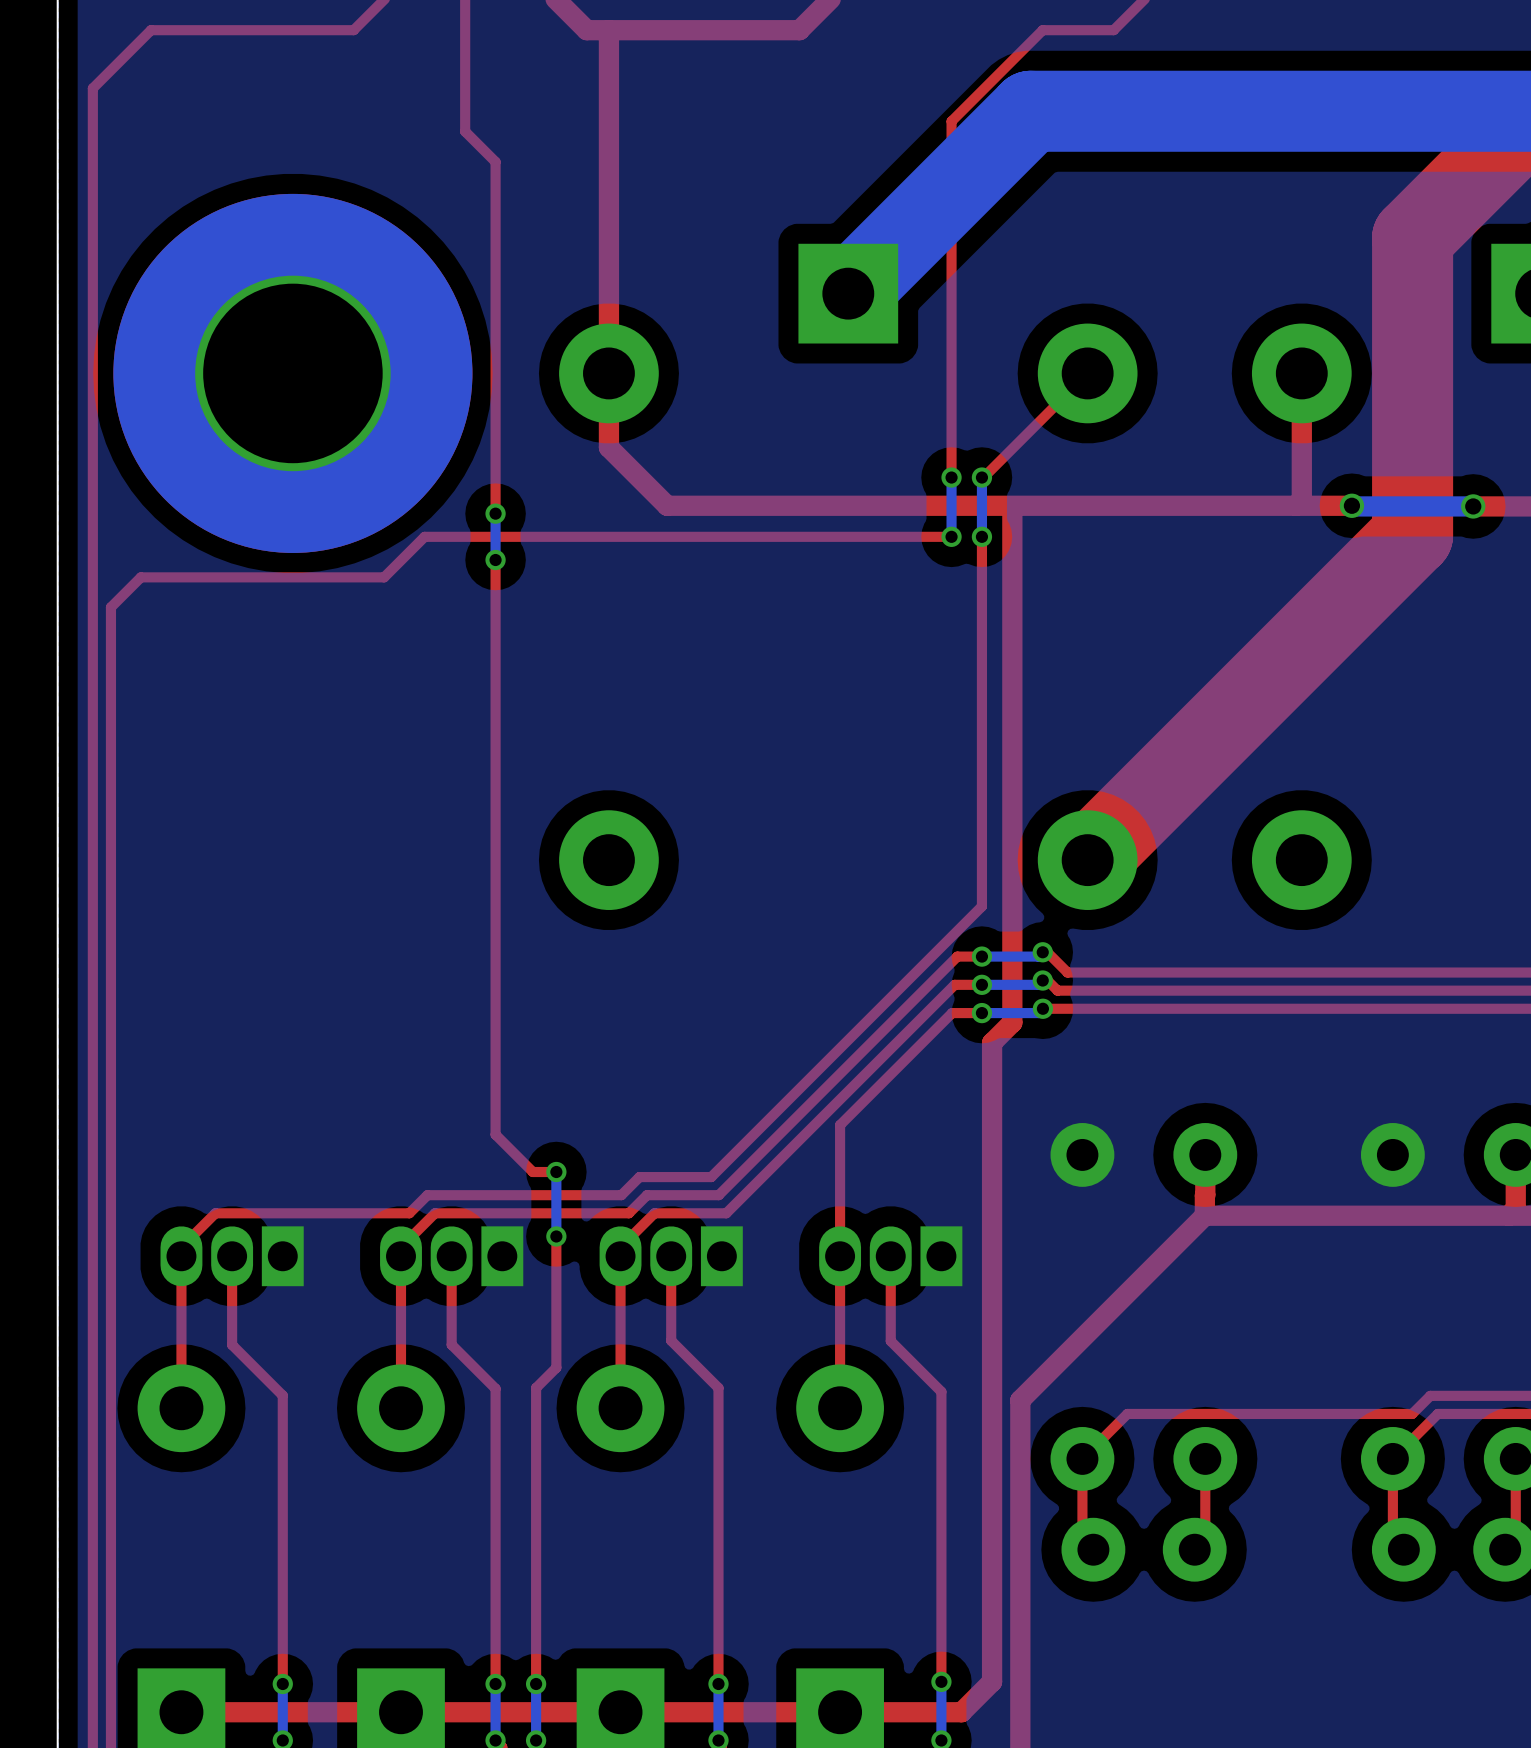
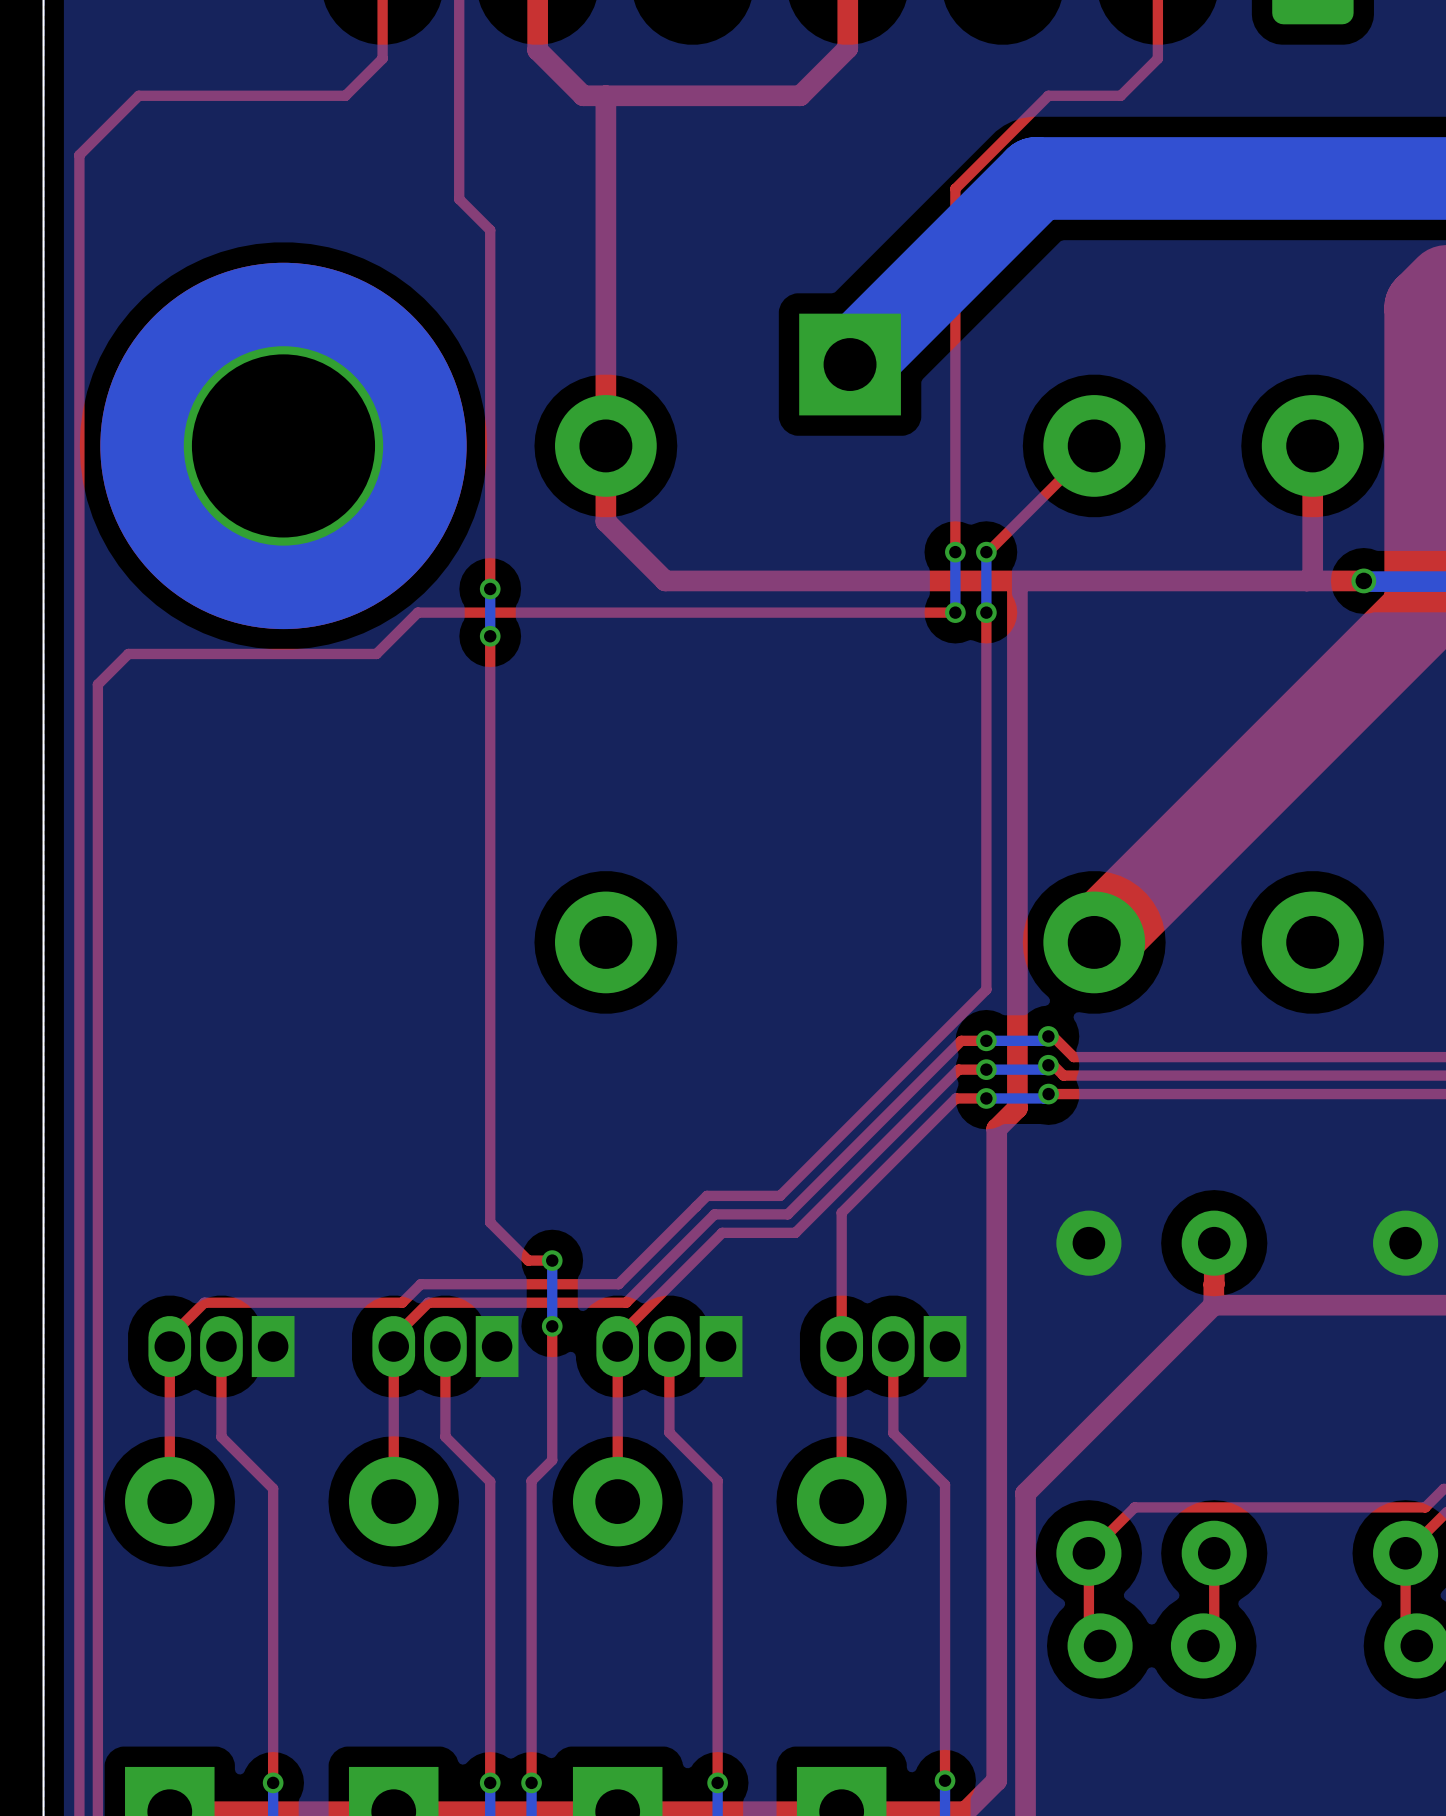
top track: (779, 1108) (711, 1177) (639, 1177) -> (780, 1195) (706, 1195) (637, 1265)
top track: (787, 1126) (718, 1195) (647, 1195) -> (787, 1214) (714, 1214) (644, 1284)
top track: (794, 1144) (726, 1213) (654, 1213) -> (795, 1232) (722, 1232) (652, 1302)

